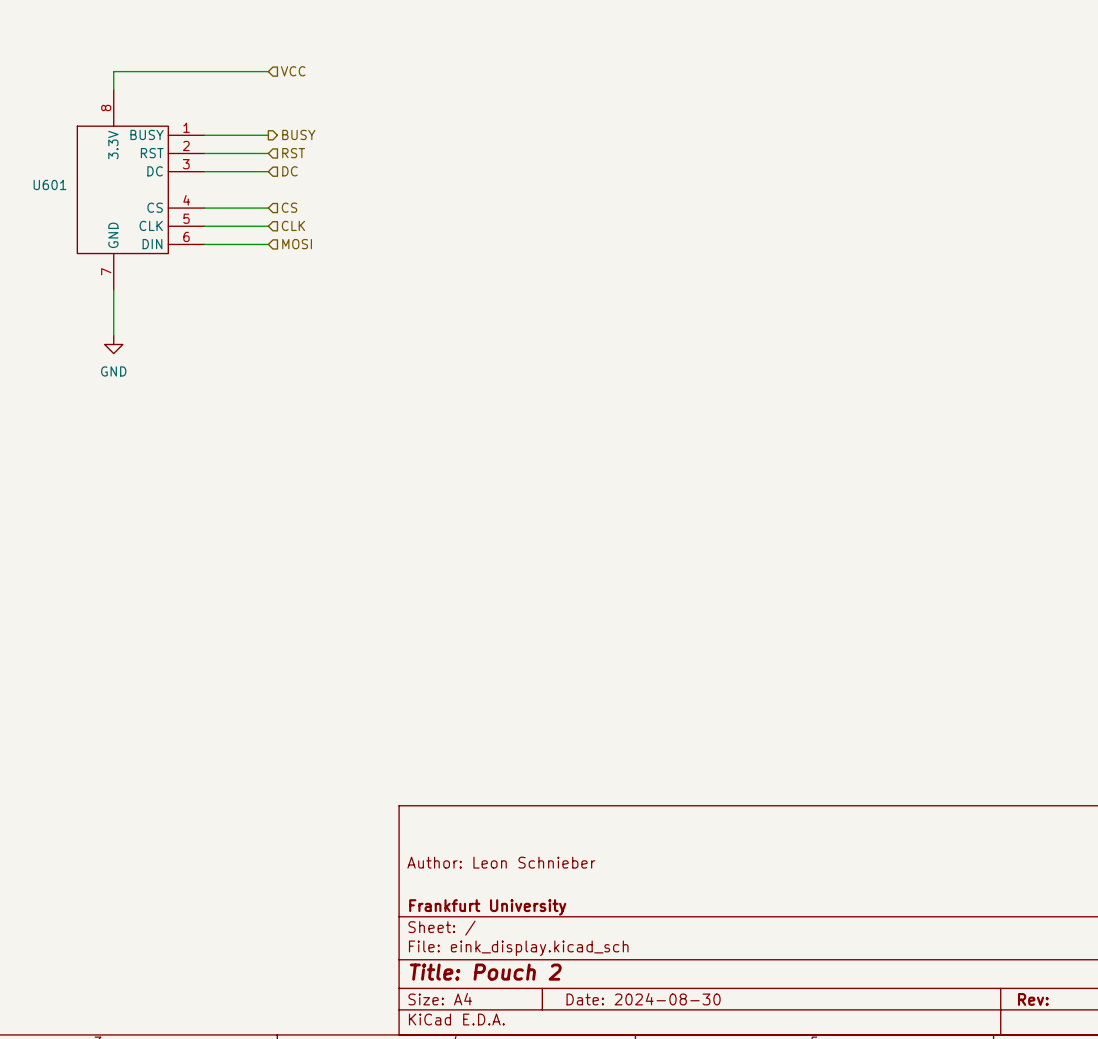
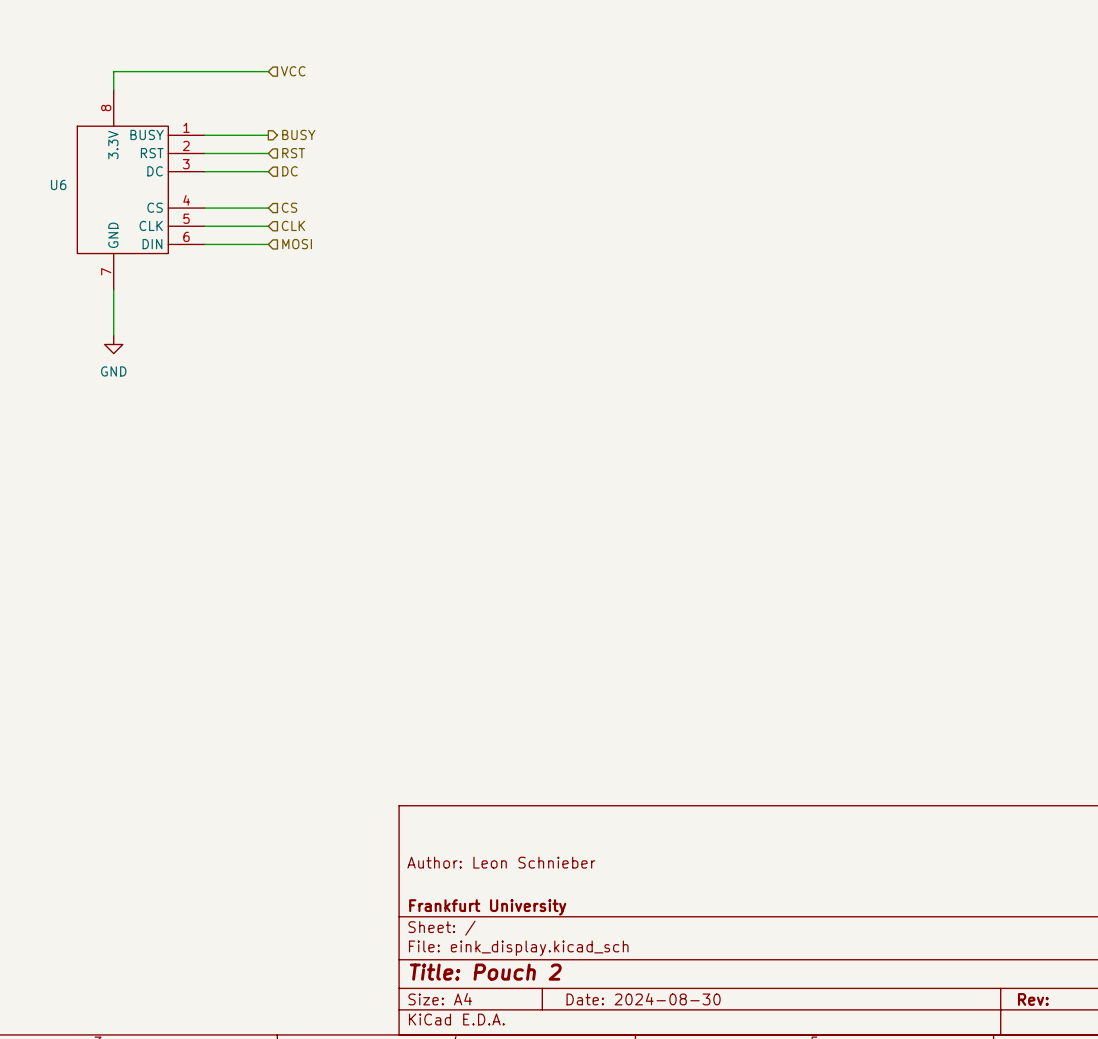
U601 name: U601 (49, 184) -> U6 (58, 184)

